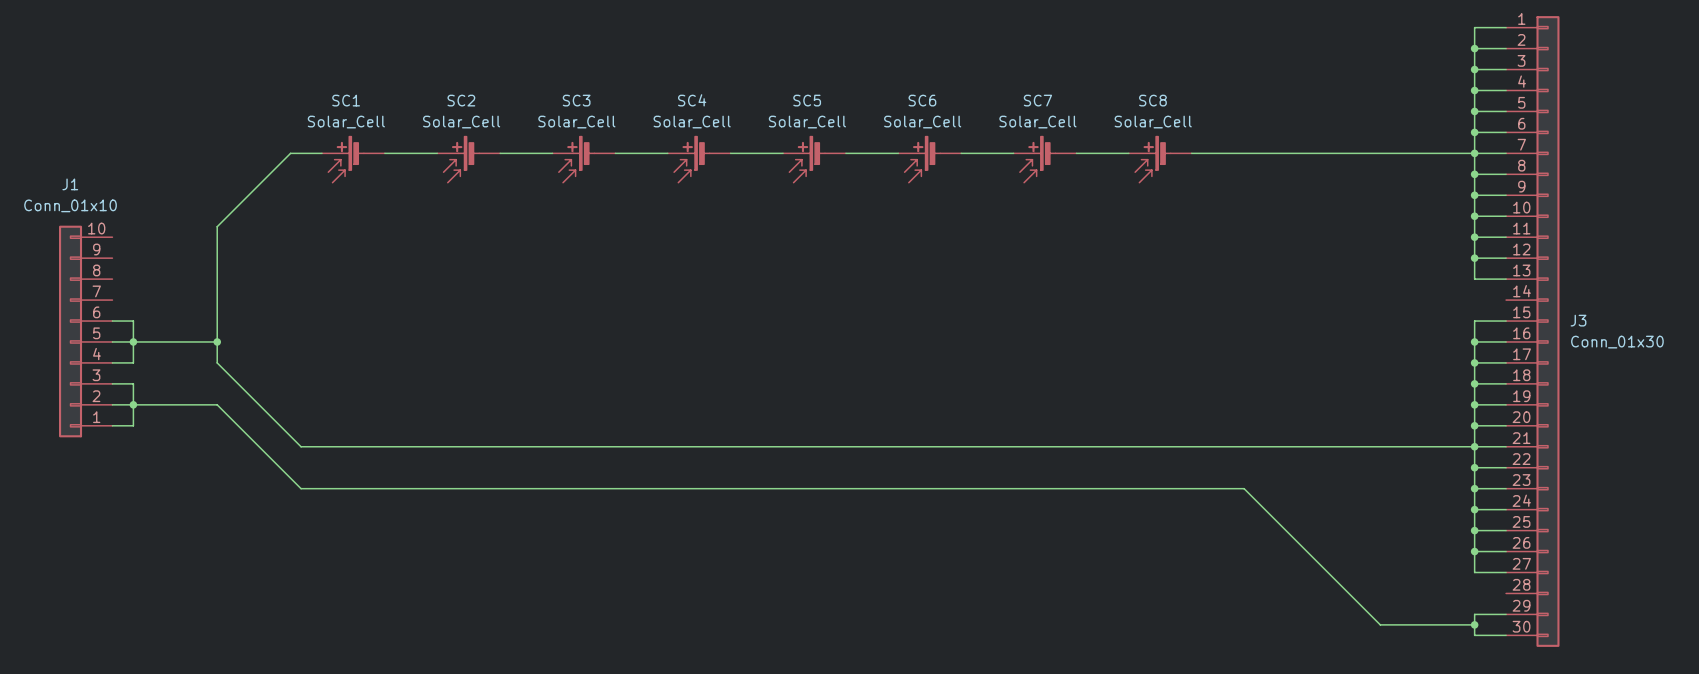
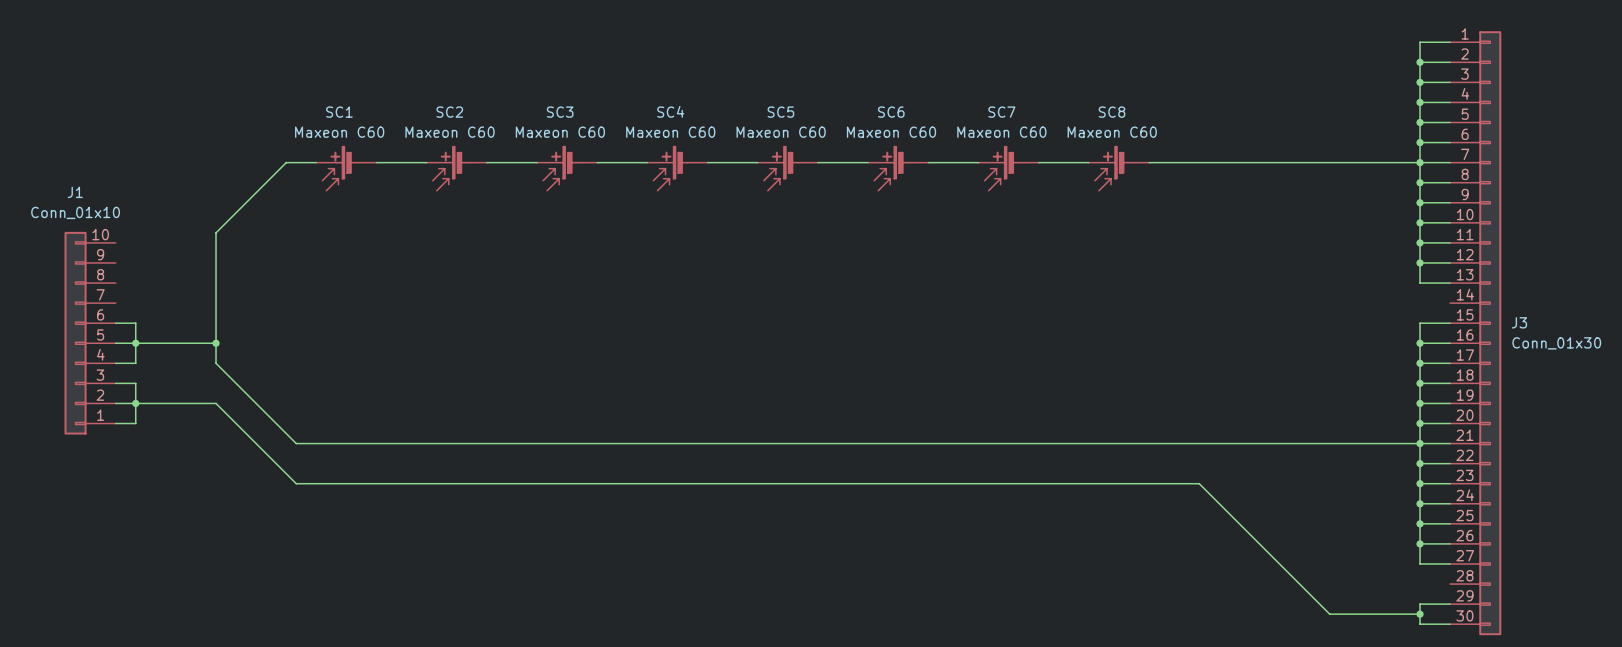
SC1 value: Solar_Cell (346, 122) -> Maxeon C60 (339, 132)
SC2 value: Solar_Cell (461, 122) -> Maxeon C60 (450, 132)
SC3 value: Solar_Cell (576, 122) -> Maxeon C60 (560, 132)
SC4 value: Solar_Cell (692, 122) -> Maxeon C60 (670, 132)
SC5 value: Solar_Cell (807, 122) -> Maxeon C60 (781, 132)
SC6 value: Solar_Cell (922, 122) -> Maxeon C60 (891, 132)
SC7 value: Solar_Cell (1037, 122) -> Maxeon C60 (1001, 132)
SC8 value: Solar_Cell (1153, 122) -> Maxeon C60 (1112, 132)

